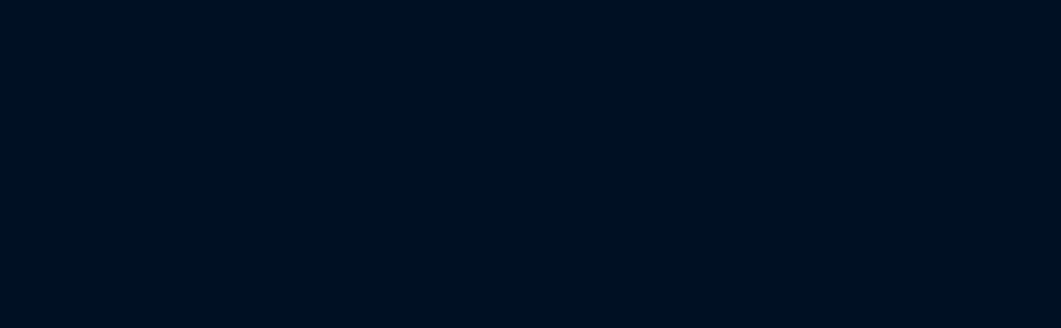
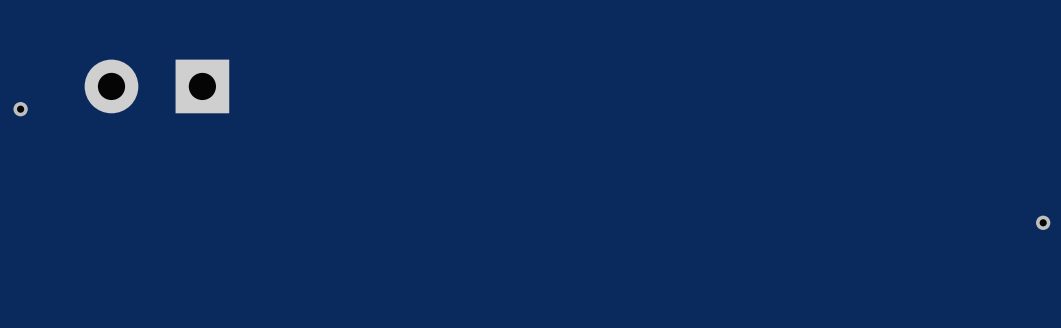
part: none -> (156, 86)
via: none -> (20, 109)
via: none -> (1043, 222)

